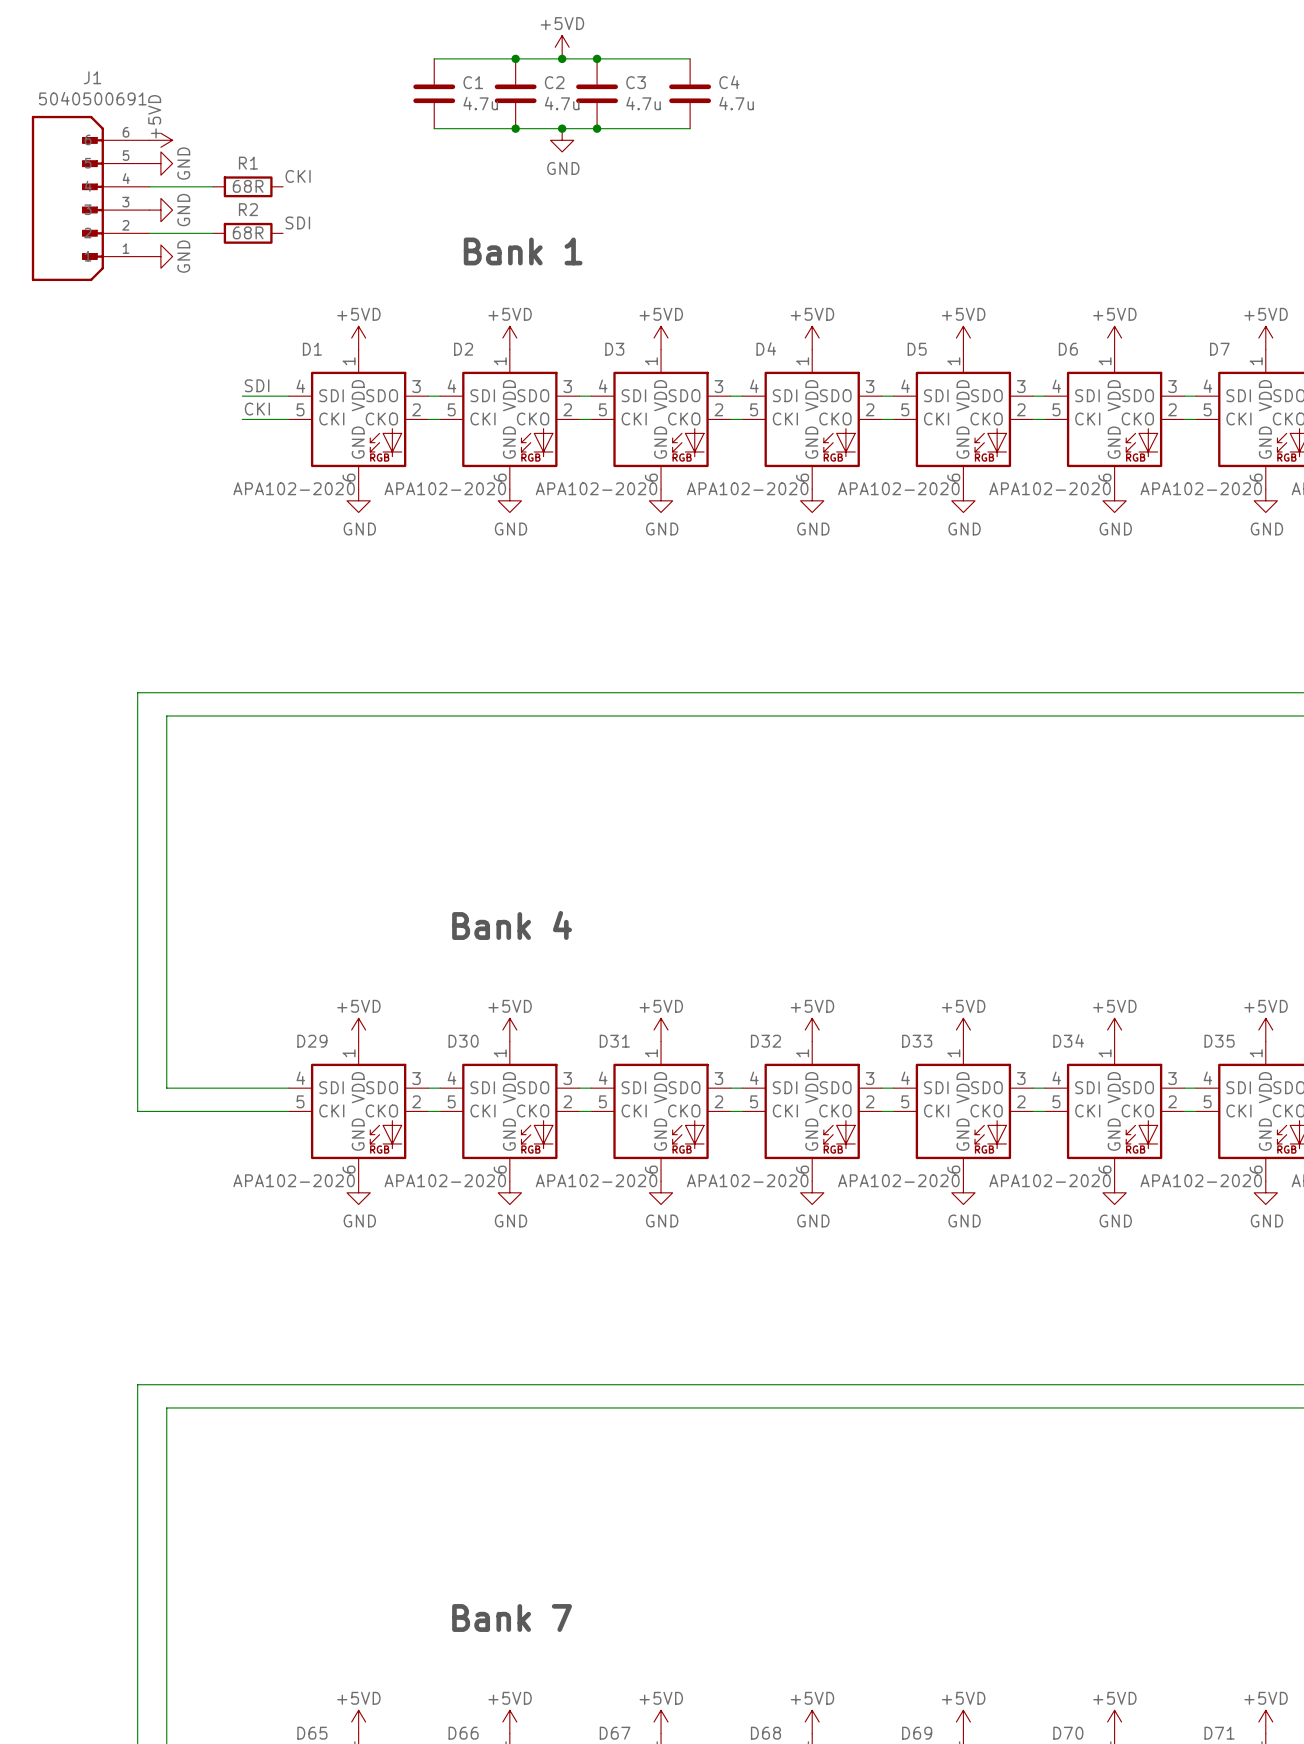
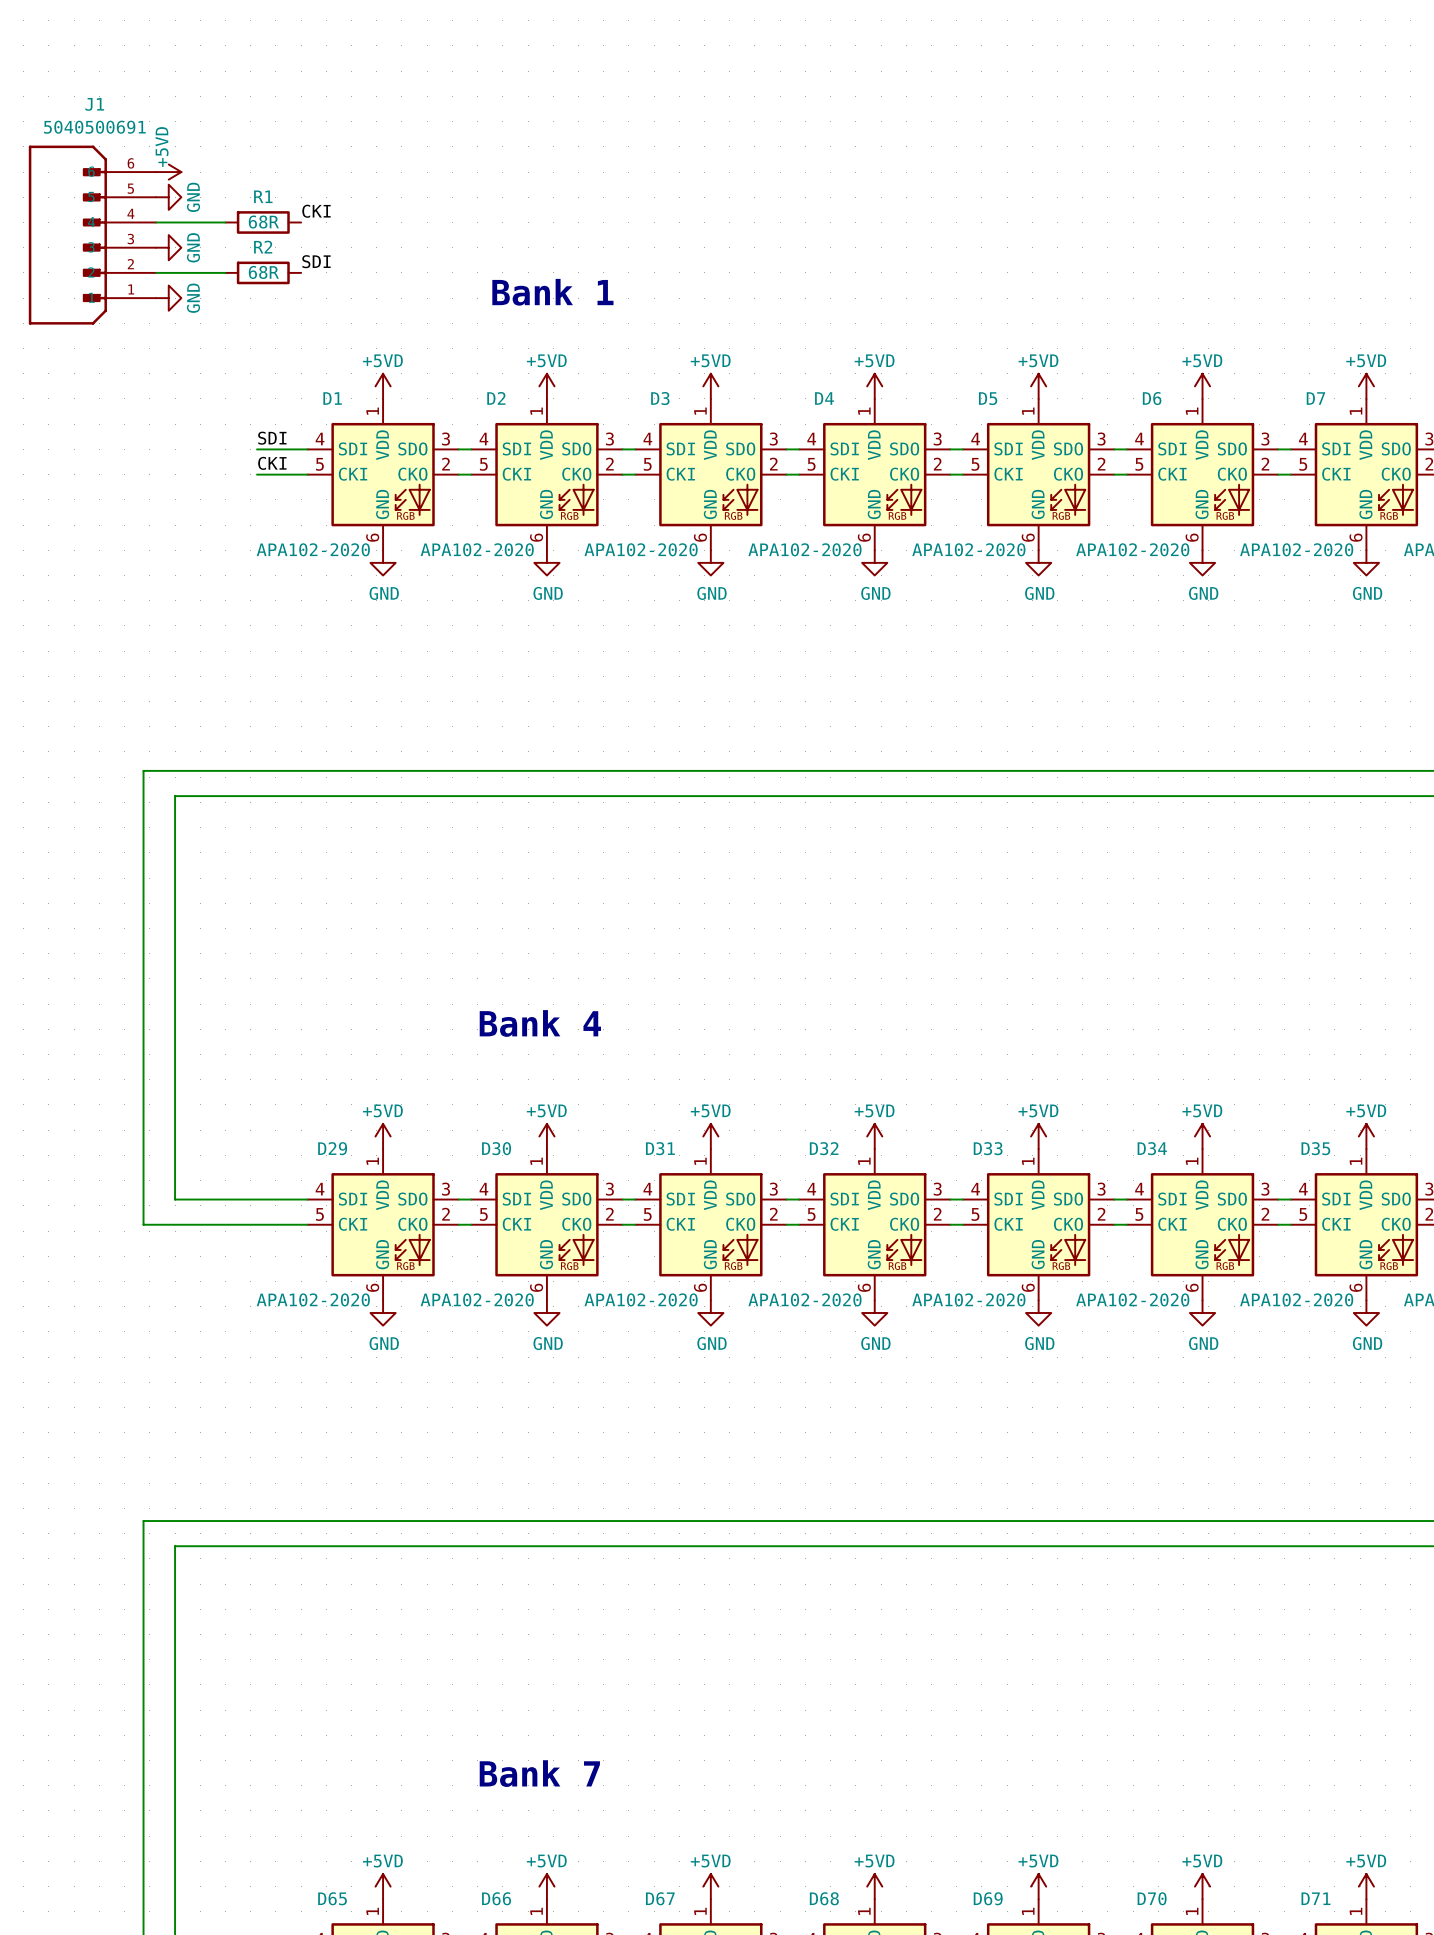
power symbol: +5VD (562, 47) -> none
wire: (434, 58) (690, 58) -> none
junction: (515, 58) -> none
junction: (562, 58) -> none
junction: (597, 58) -> none
C1: 4.7u (434, 93) -> none
C2: 4.7u (515, 93) -> none
C3: 4.7u (597, 93) -> none
C4: 4.7u (690, 93) -> none
wire: (434, 128) (690, 128) -> none
junction: (515, 128) -> none
junction: (562, 128) -> none
junction: (597, 128) -> none
power symbol: GND (562, 140) -> none

